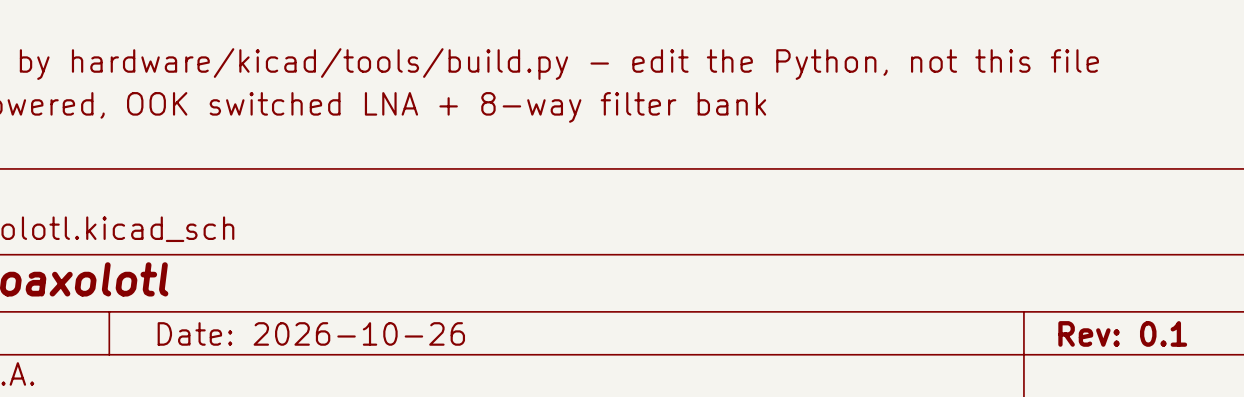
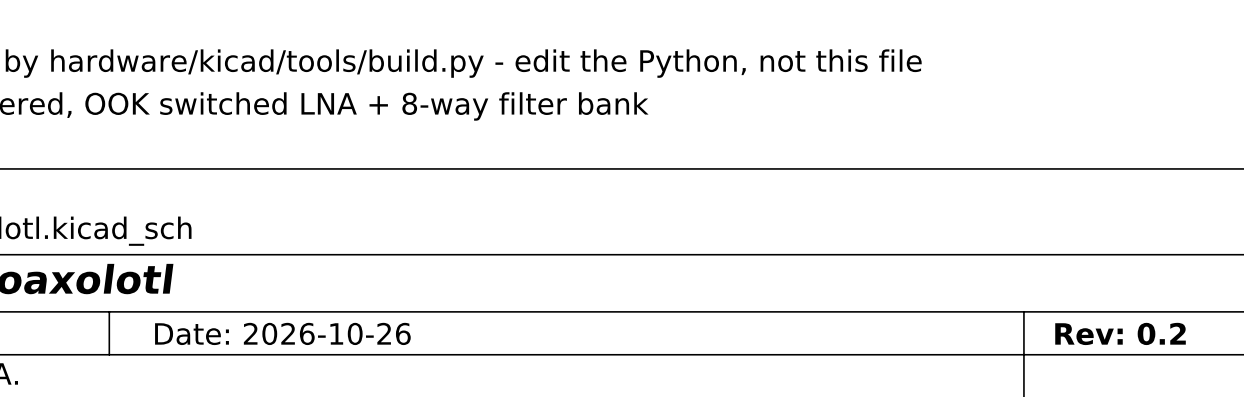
title block: Rev: 0.1 (1122, 333) -> Rev: 0.2 (1120, 333)

